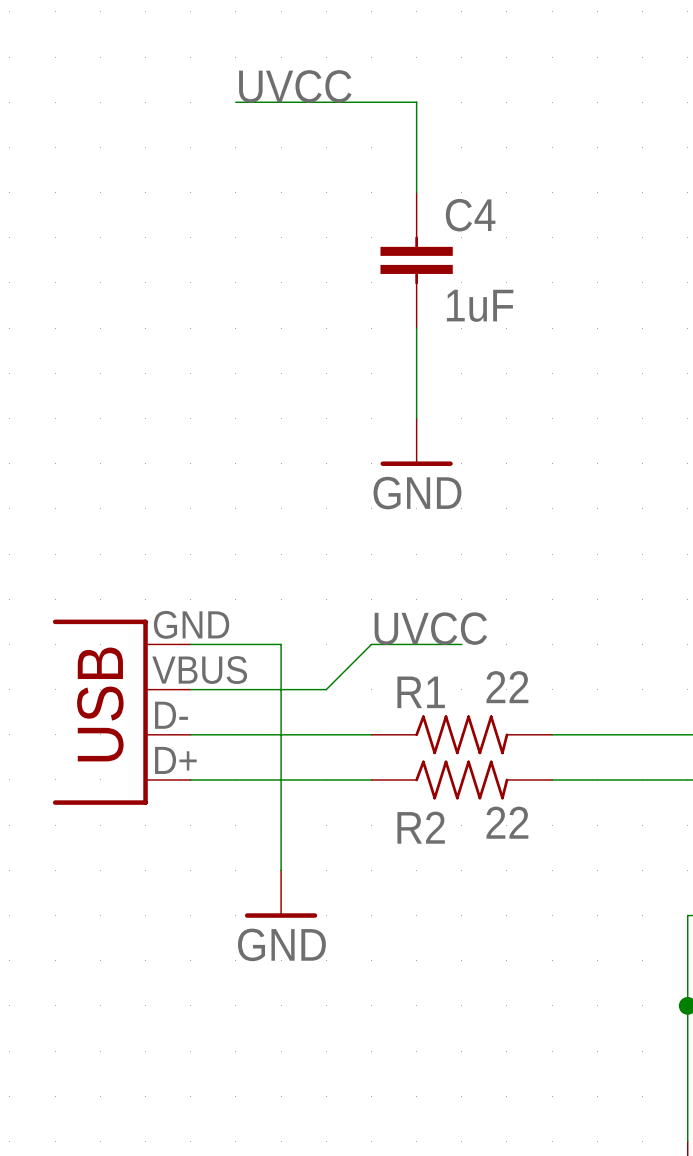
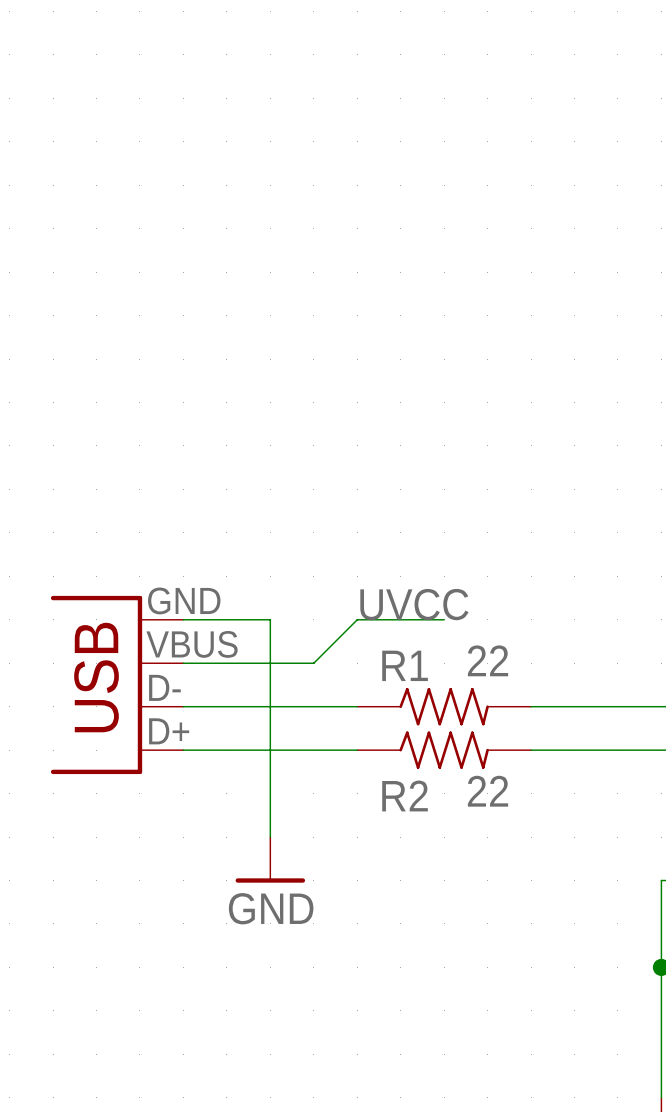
label: UVCC (295, 86) -> none
wire: (235, 102) (416, 102) (416, 192) -> none
C4: 1uF (416, 260) -> none
wire: (416, 328) (416, 418) -> none
power symbol: GND (416, 442) -> none

